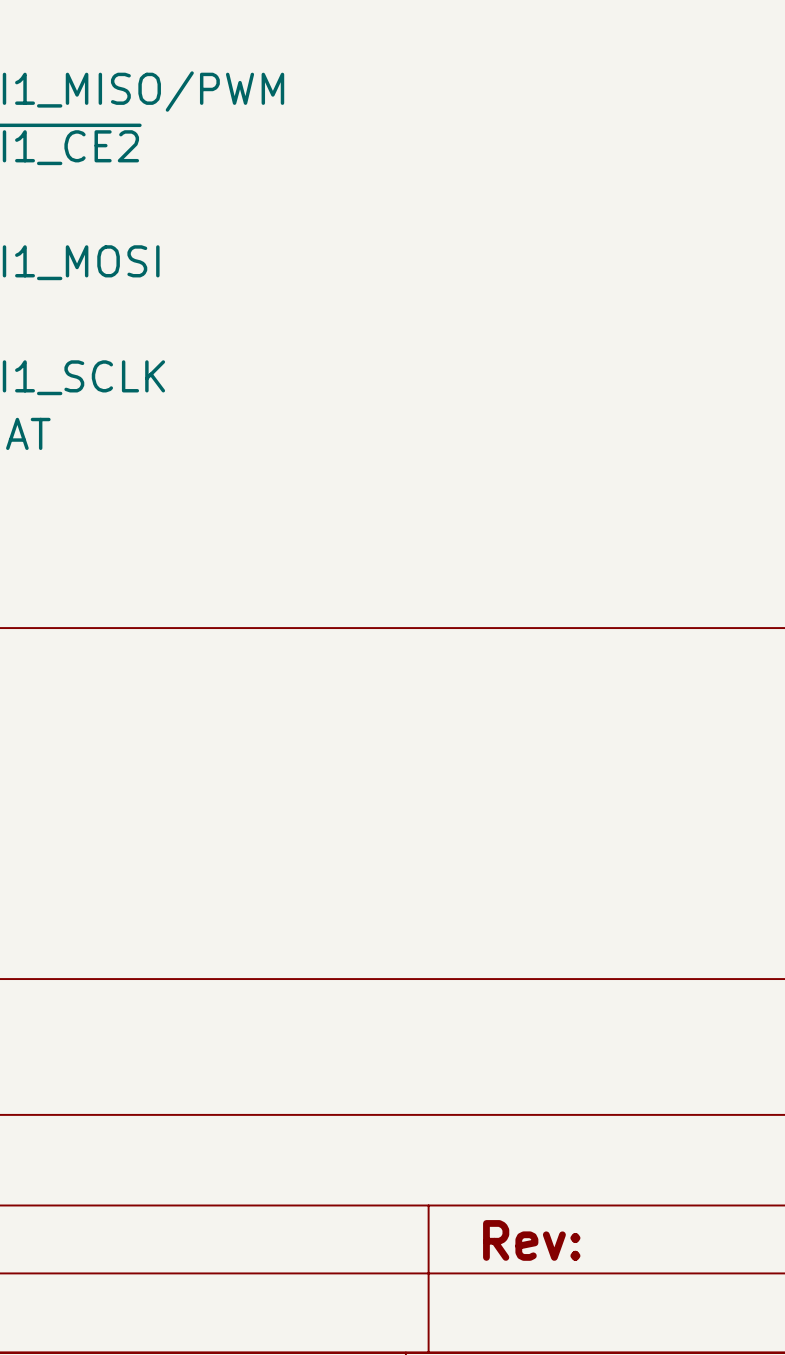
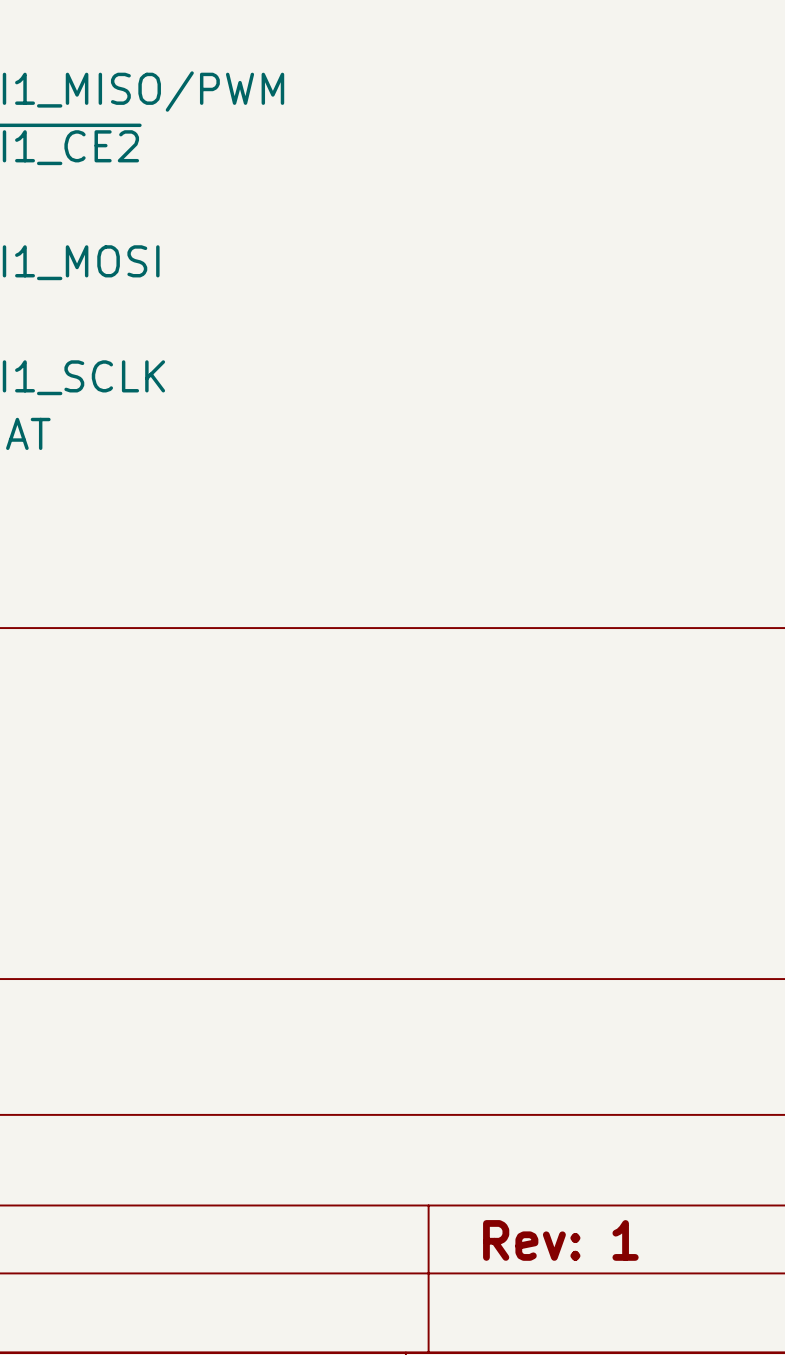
title block: Rev: (531, 1240) -> Rev: 1 (560, 1240)

